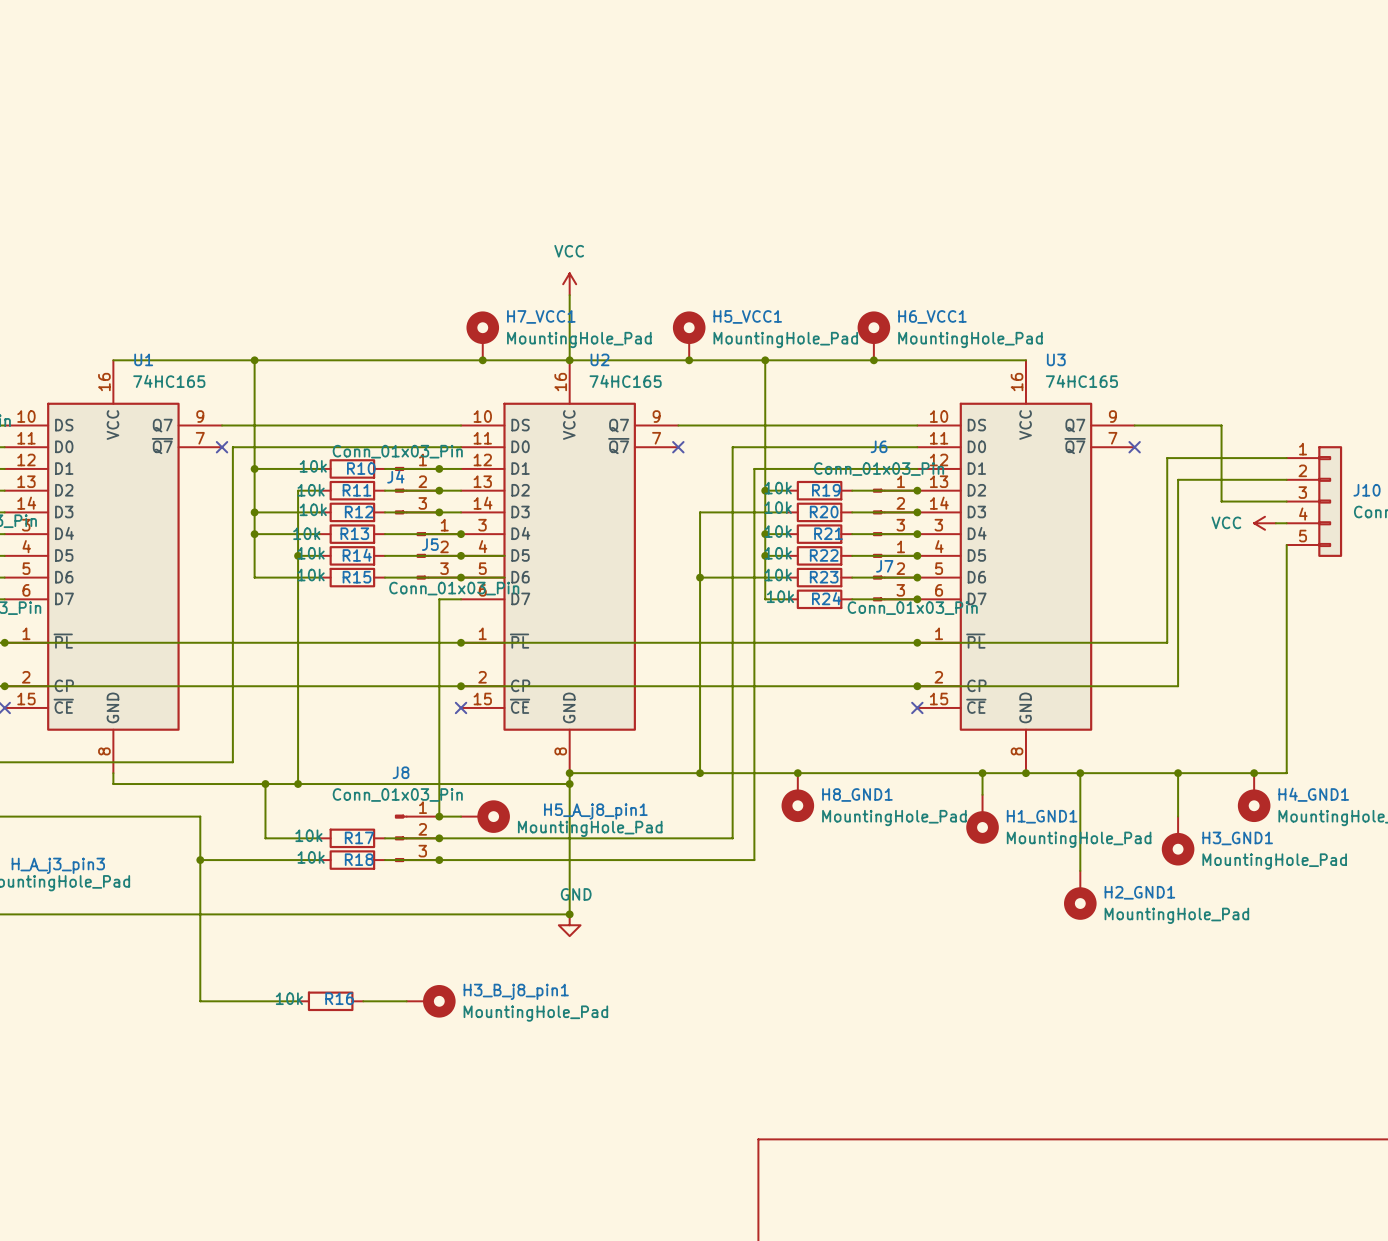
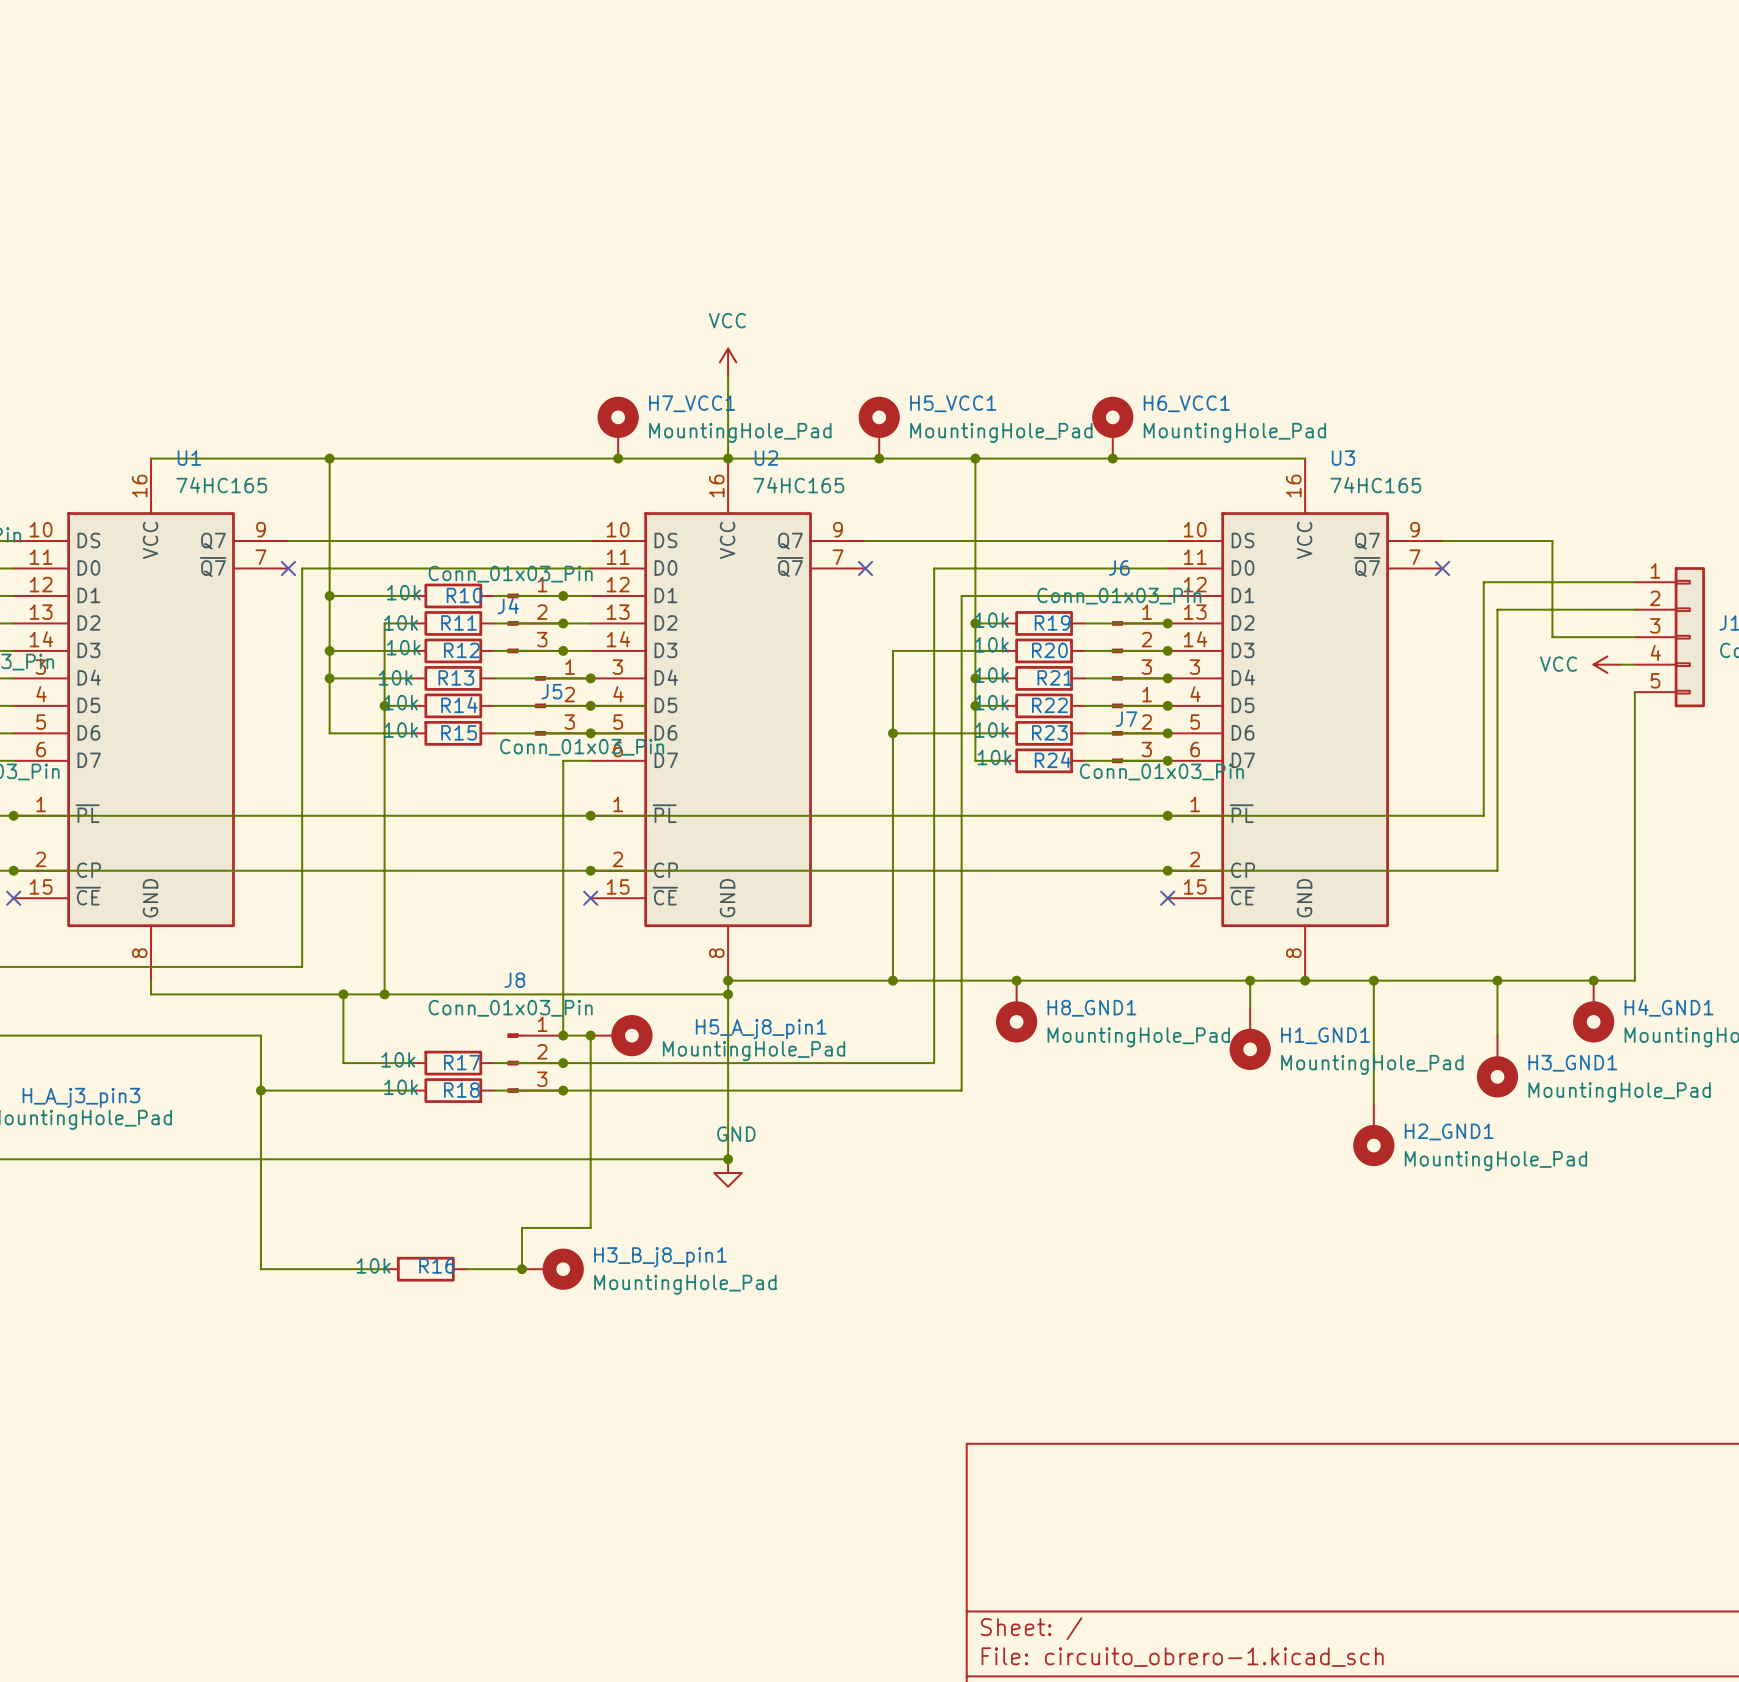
wire: none -> (590, 1035) (590, 1227) (521, 1227) (521, 1269)
junction: none -> (590, 1035)
junction: none -> (521, 1269)

